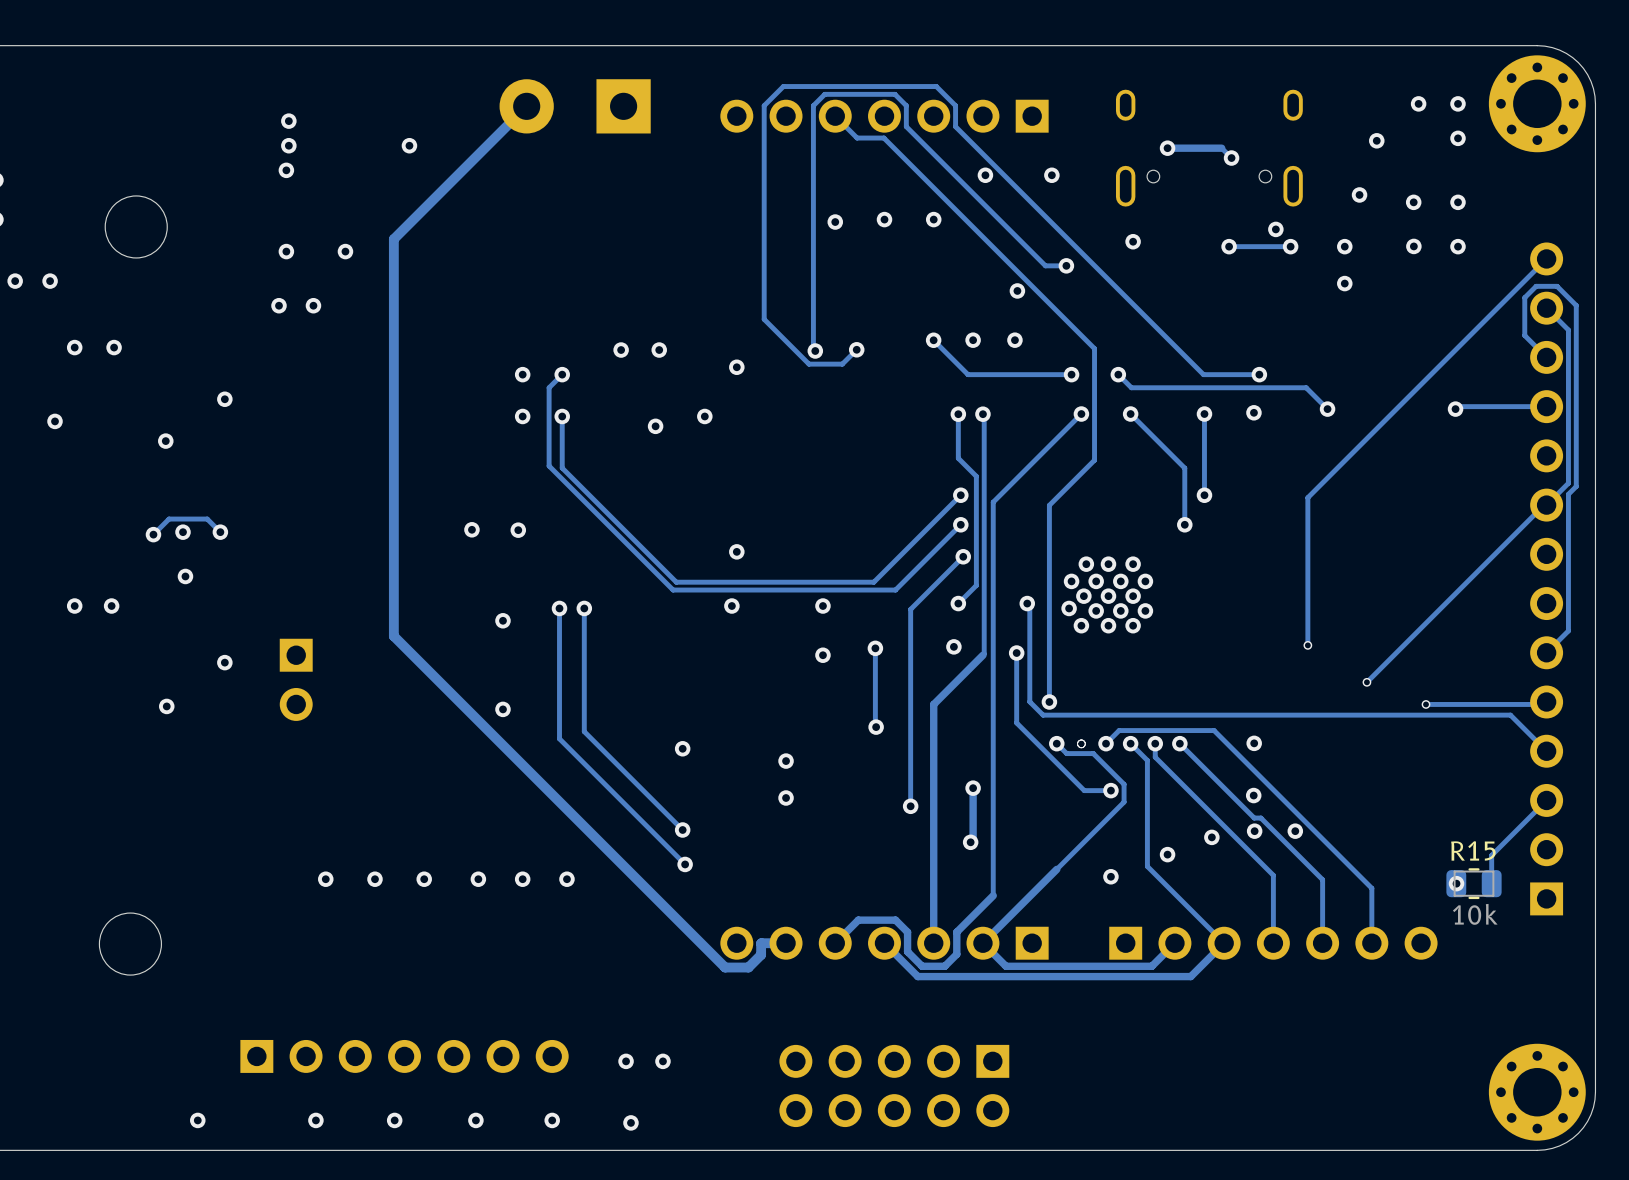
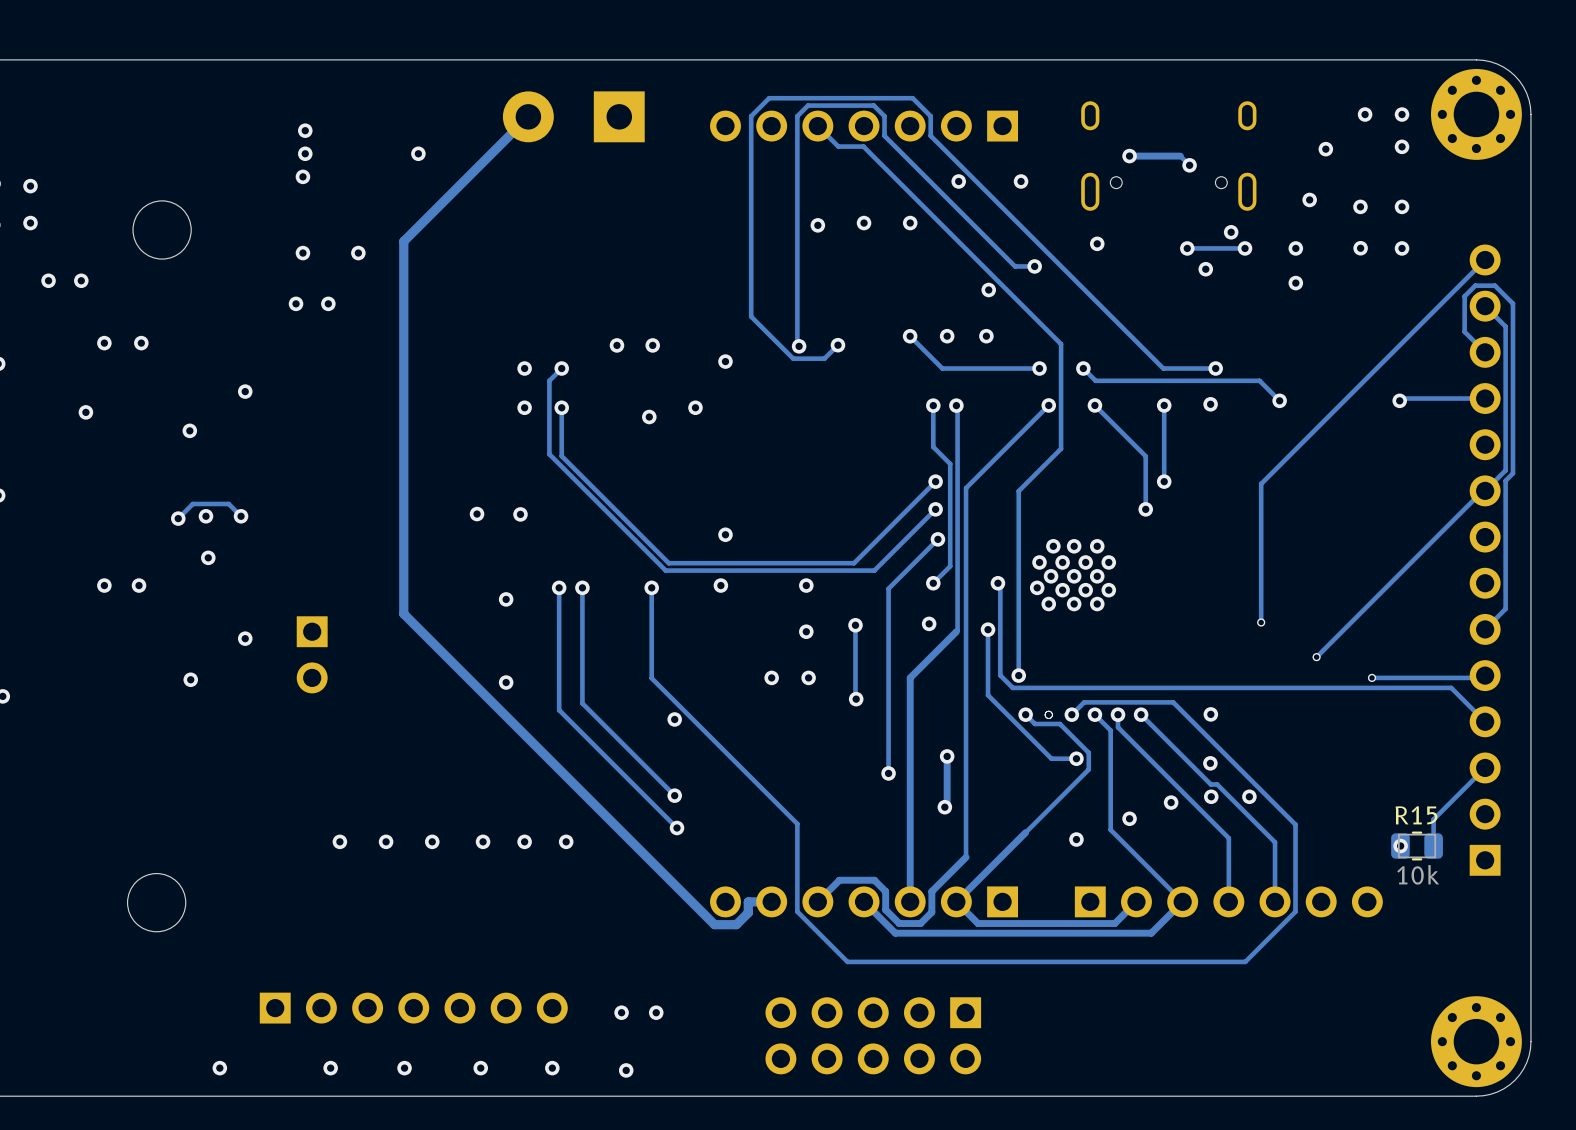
via: none -> (1205, 269)
via: none -> (651, 587)
via: none -> (771, 677)
via: none -> (808, 677)
via: (786, 761) -> none
via: (786, 798) -> none
track: (1344, 860) (1371, 888) (1371, 943) -> (1295, 824) (1295, 911) (1245, 961) (847, 961) (797, 911) (797, 823) (651, 678) (651, 587)

